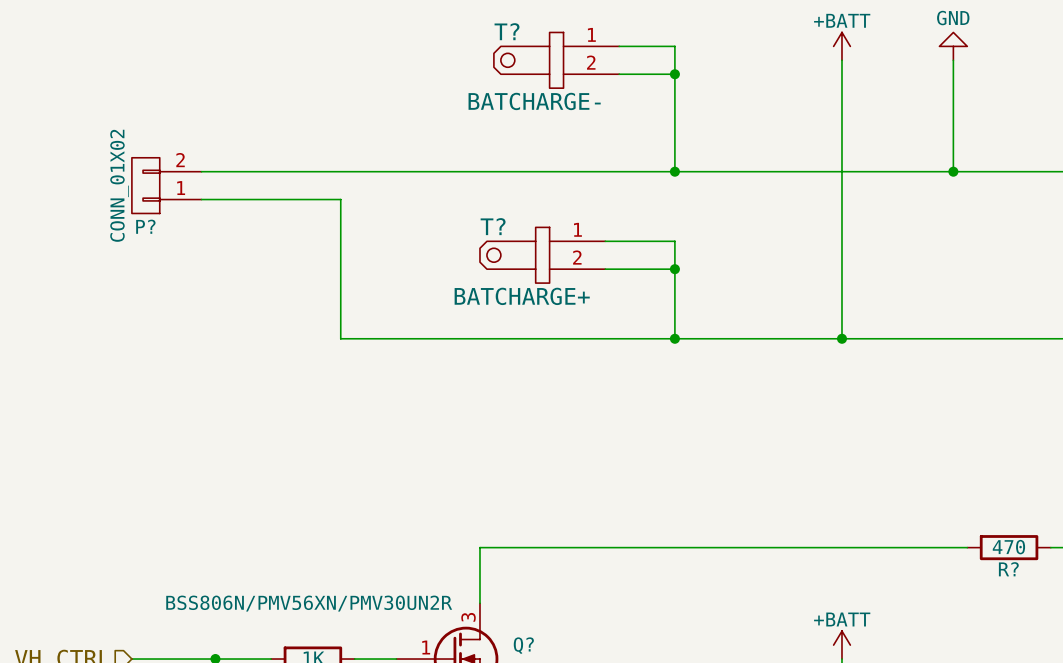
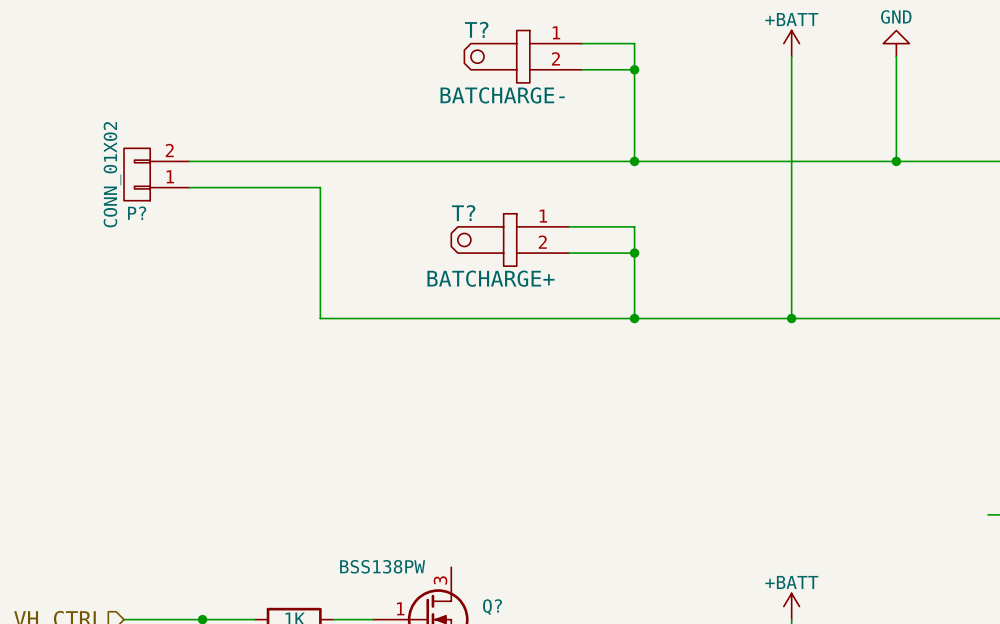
wire: (967, 547) (479, 547) (479, 603) -> none
R?: 470 (1009, 547) -> none
Q? value: BSS806N/PMV56XN/PMV30UN2R (309, 603) -> BSS138PW (382, 566)

